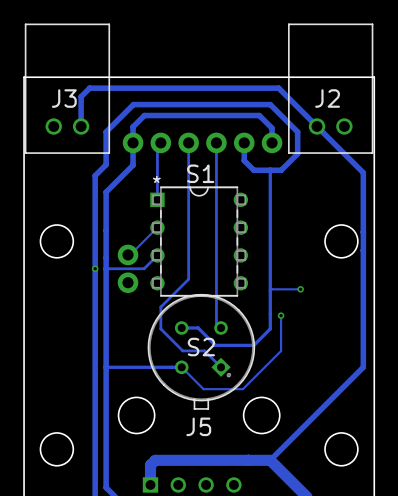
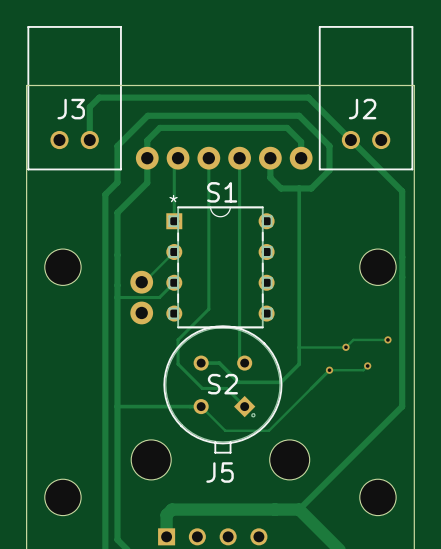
via: (95, 268) -> none
track: (300, 289) (270, 290) -> none
via: (300, 289) -> none
track: none -> (387, 339) (353, 339) (345, 347) (299, 347)
via: none -> (387, 339)
via: none -> (345, 347)
track: (281, 315) (281, 351) -> (367, 365) (363, 370) (329, 370) (311, 388)
via: (281, 315) -> none
via: none -> (367, 365)
via: none -> (329, 370)

